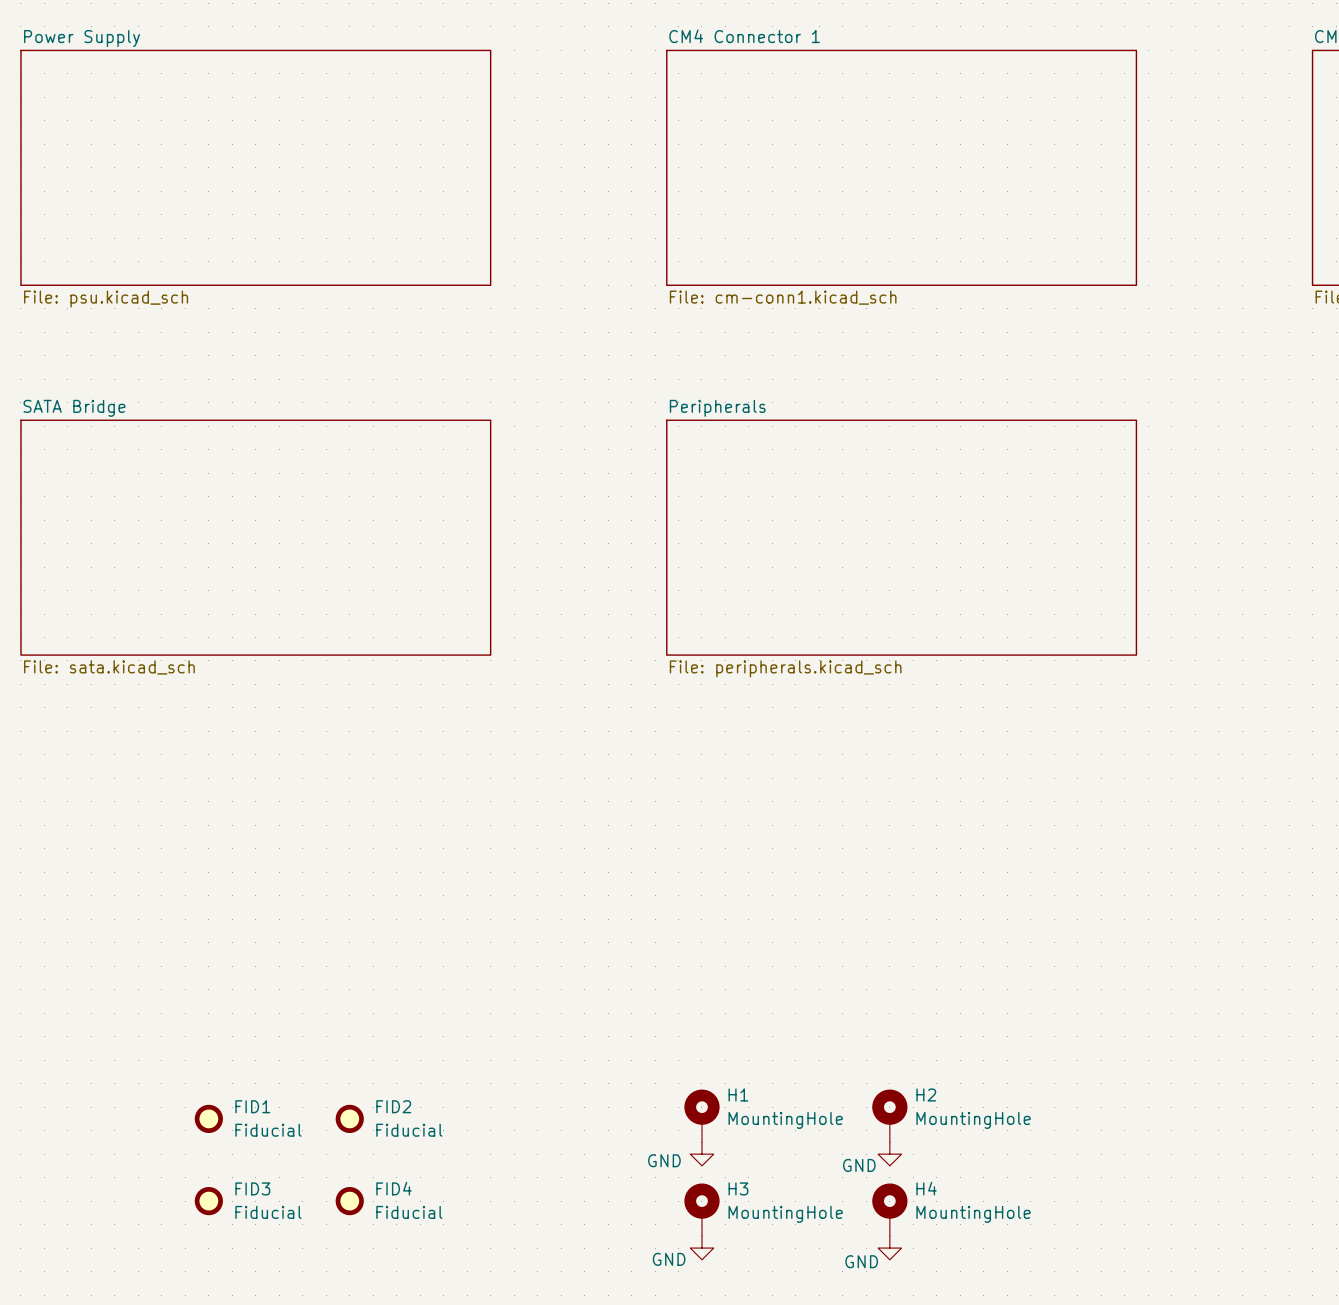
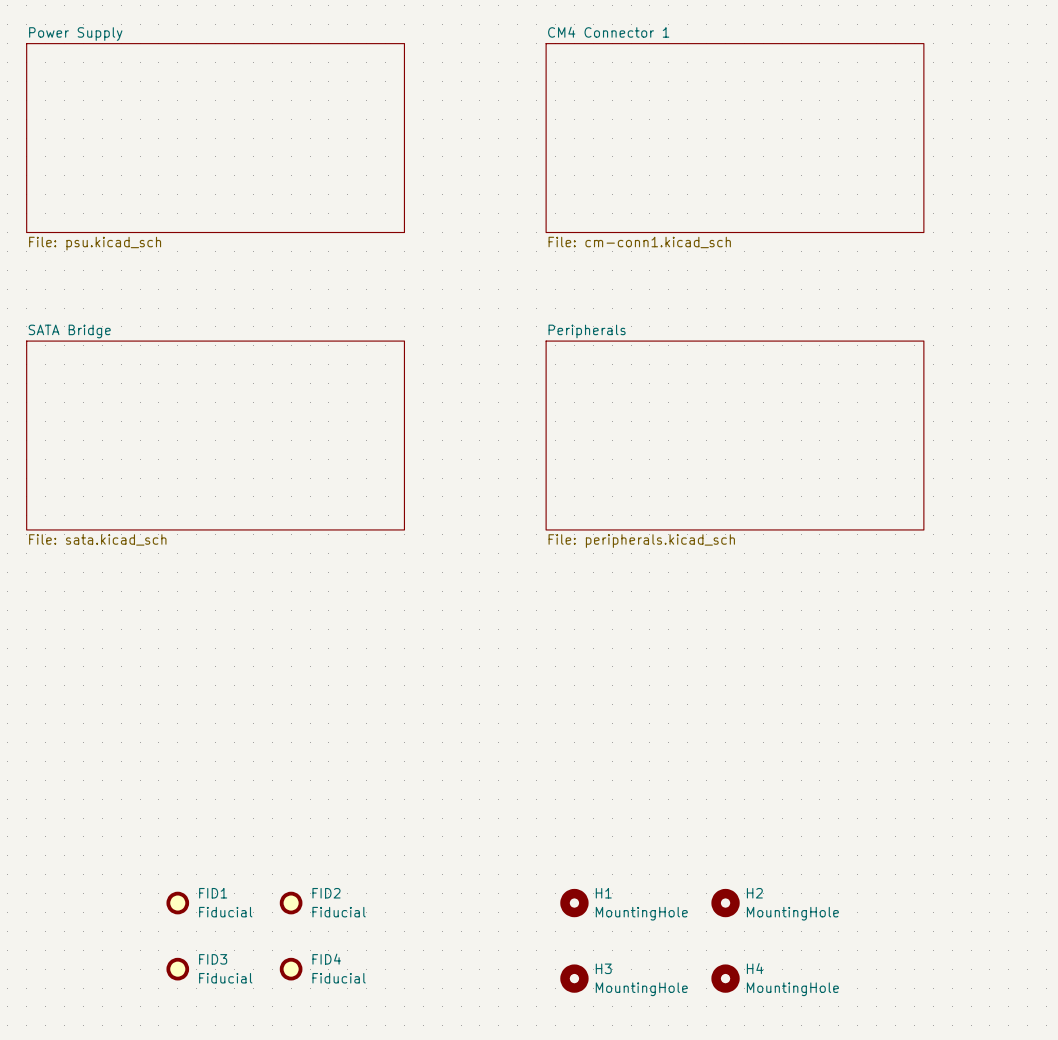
H1 symbol: [684, 1089, 720, 1143] -> [560, 888, 589, 918]
H2 symbol: [872, 1089, 908, 1143] -> [711, 888, 740, 918]
power symbol: GND (701, 1154) -> none
power symbol: GND (889, 1154) -> none
H3 symbol: [684, 1183, 720, 1237] -> [560, 964, 589, 993]
H4 symbol: [872, 1183, 908, 1237] -> [711, 964, 740, 993]
power symbol: GND (701, 1248) -> none
power symbol: GND (889, 1248) -> none

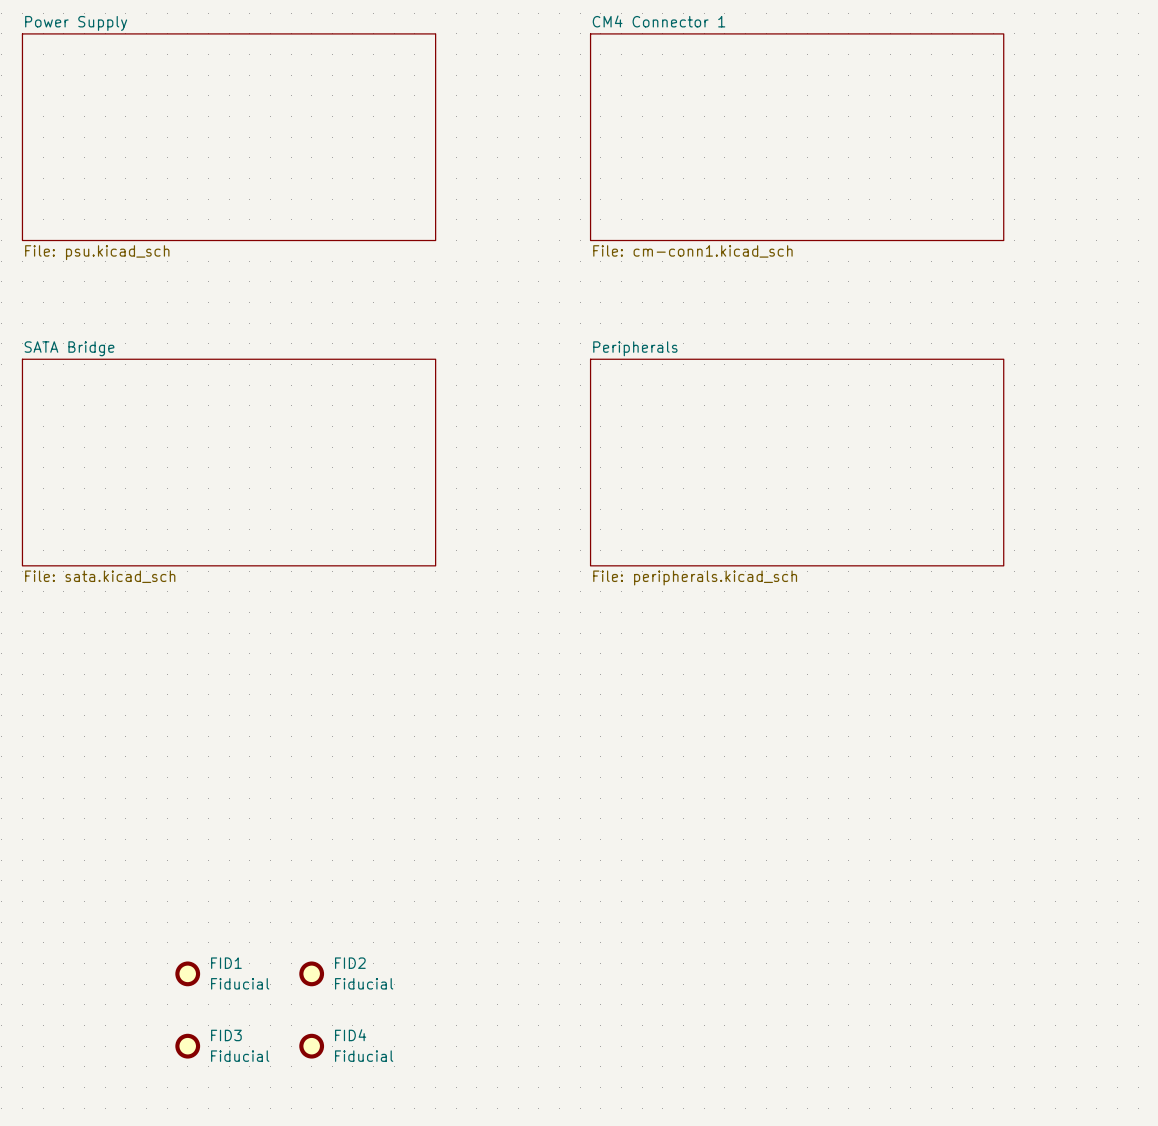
H1: MountingHole (574, 903) -> none
H2: MountingHole (725, 903) -> none
H3: MountingHole (574, 978) -> none
H4: MountingHole (725, 978) -> none

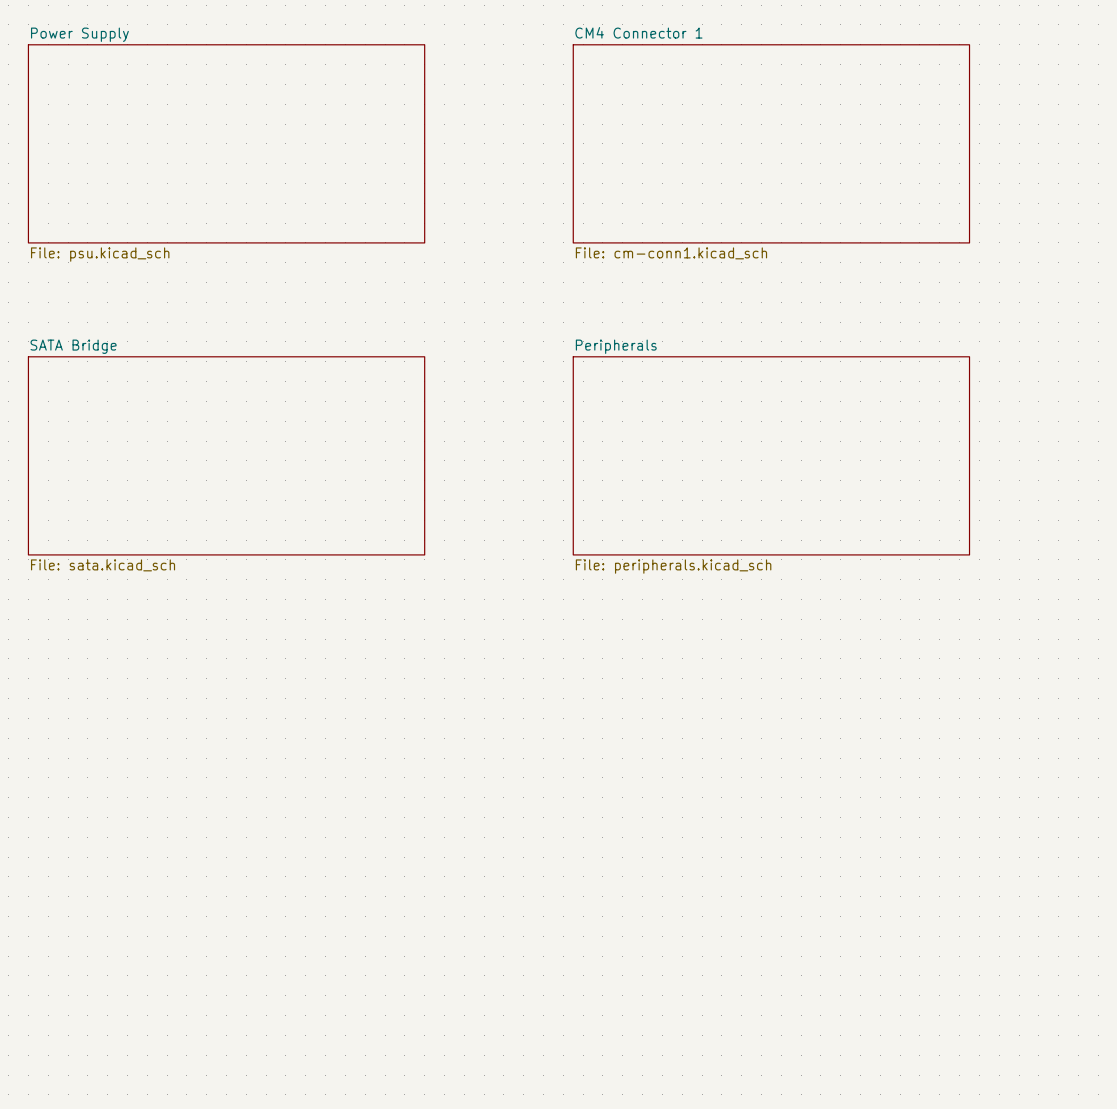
FID1: Fiducial (187, 973) -> none
FID2: Fiducial (311, 973) -> none
FID3: Fiducial (187, 1046) -> none
FID4: Fiducial (311, 1046) -> none

